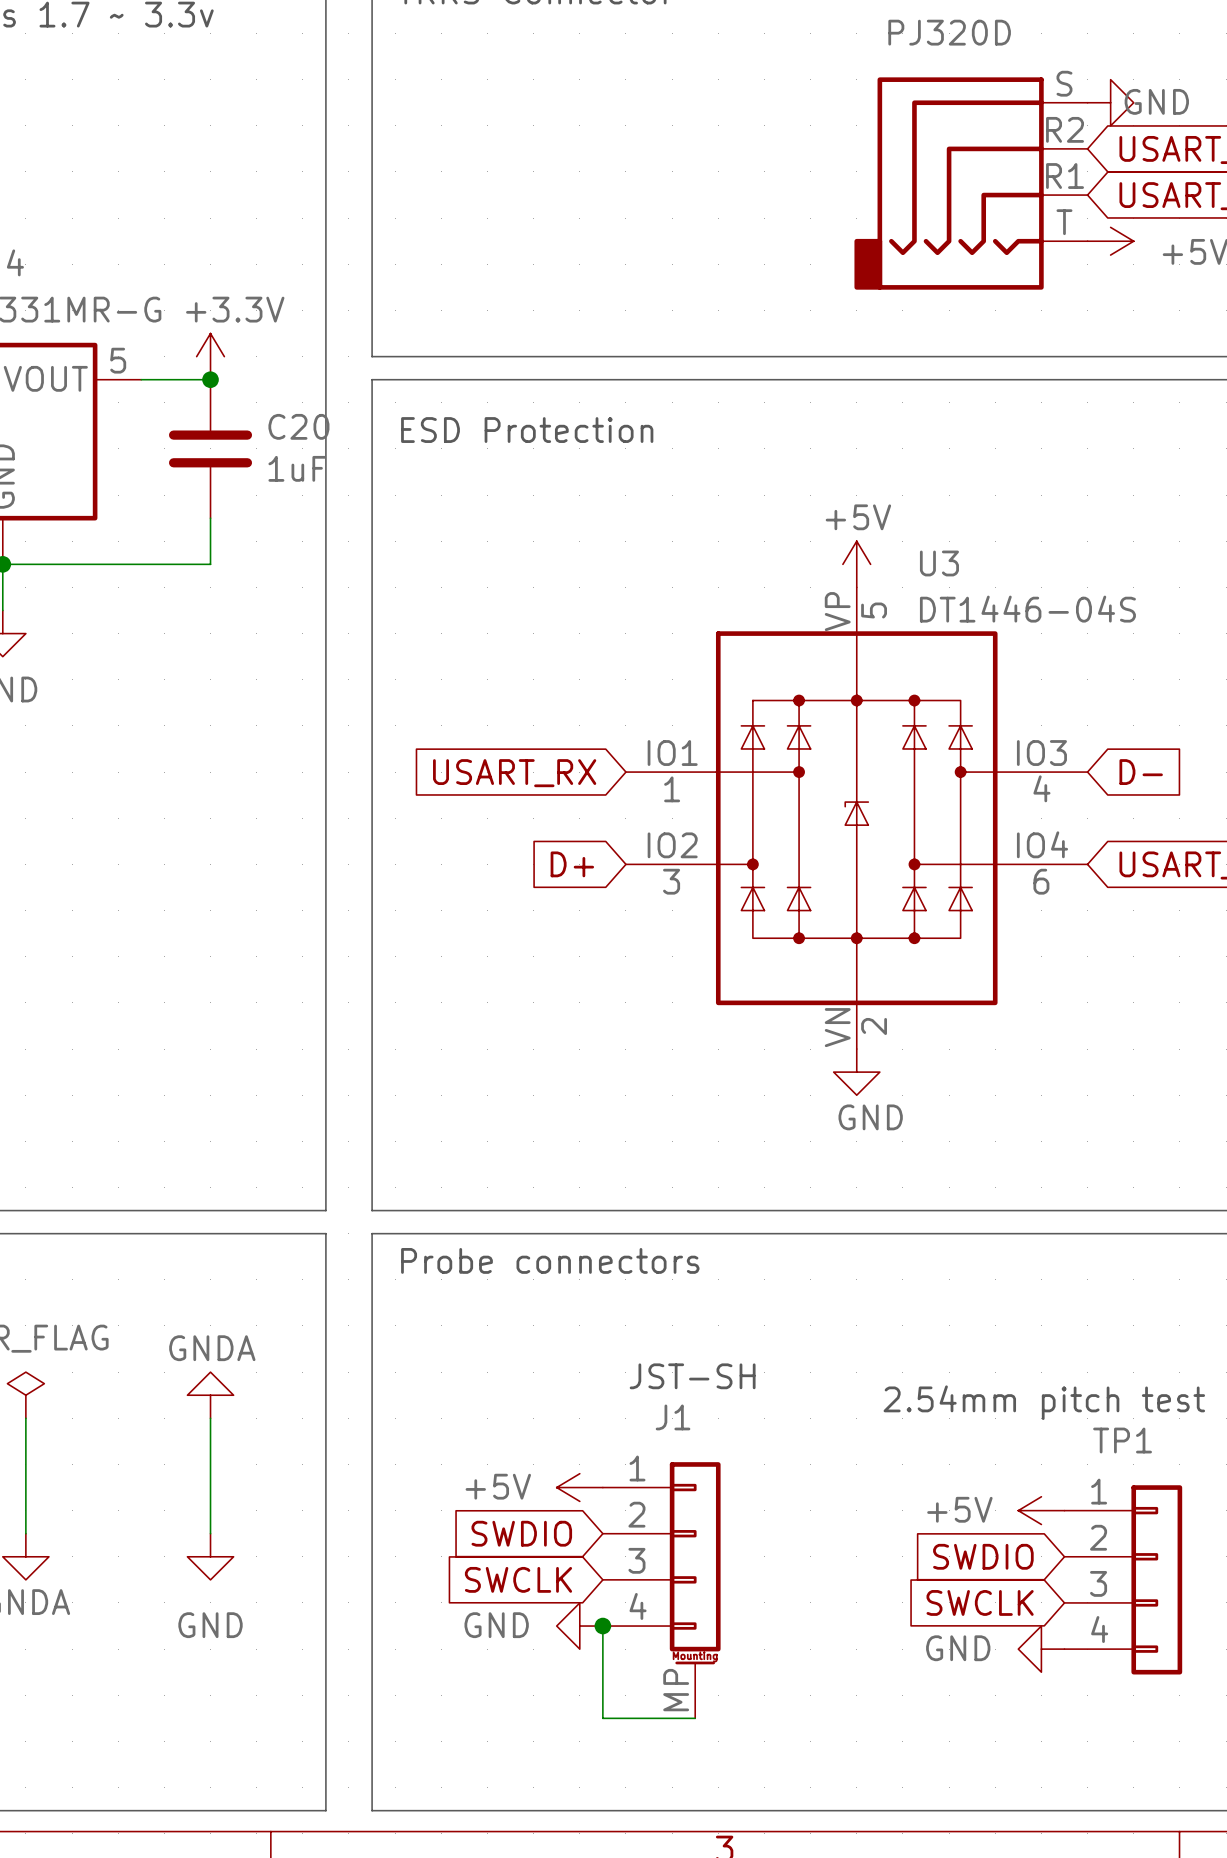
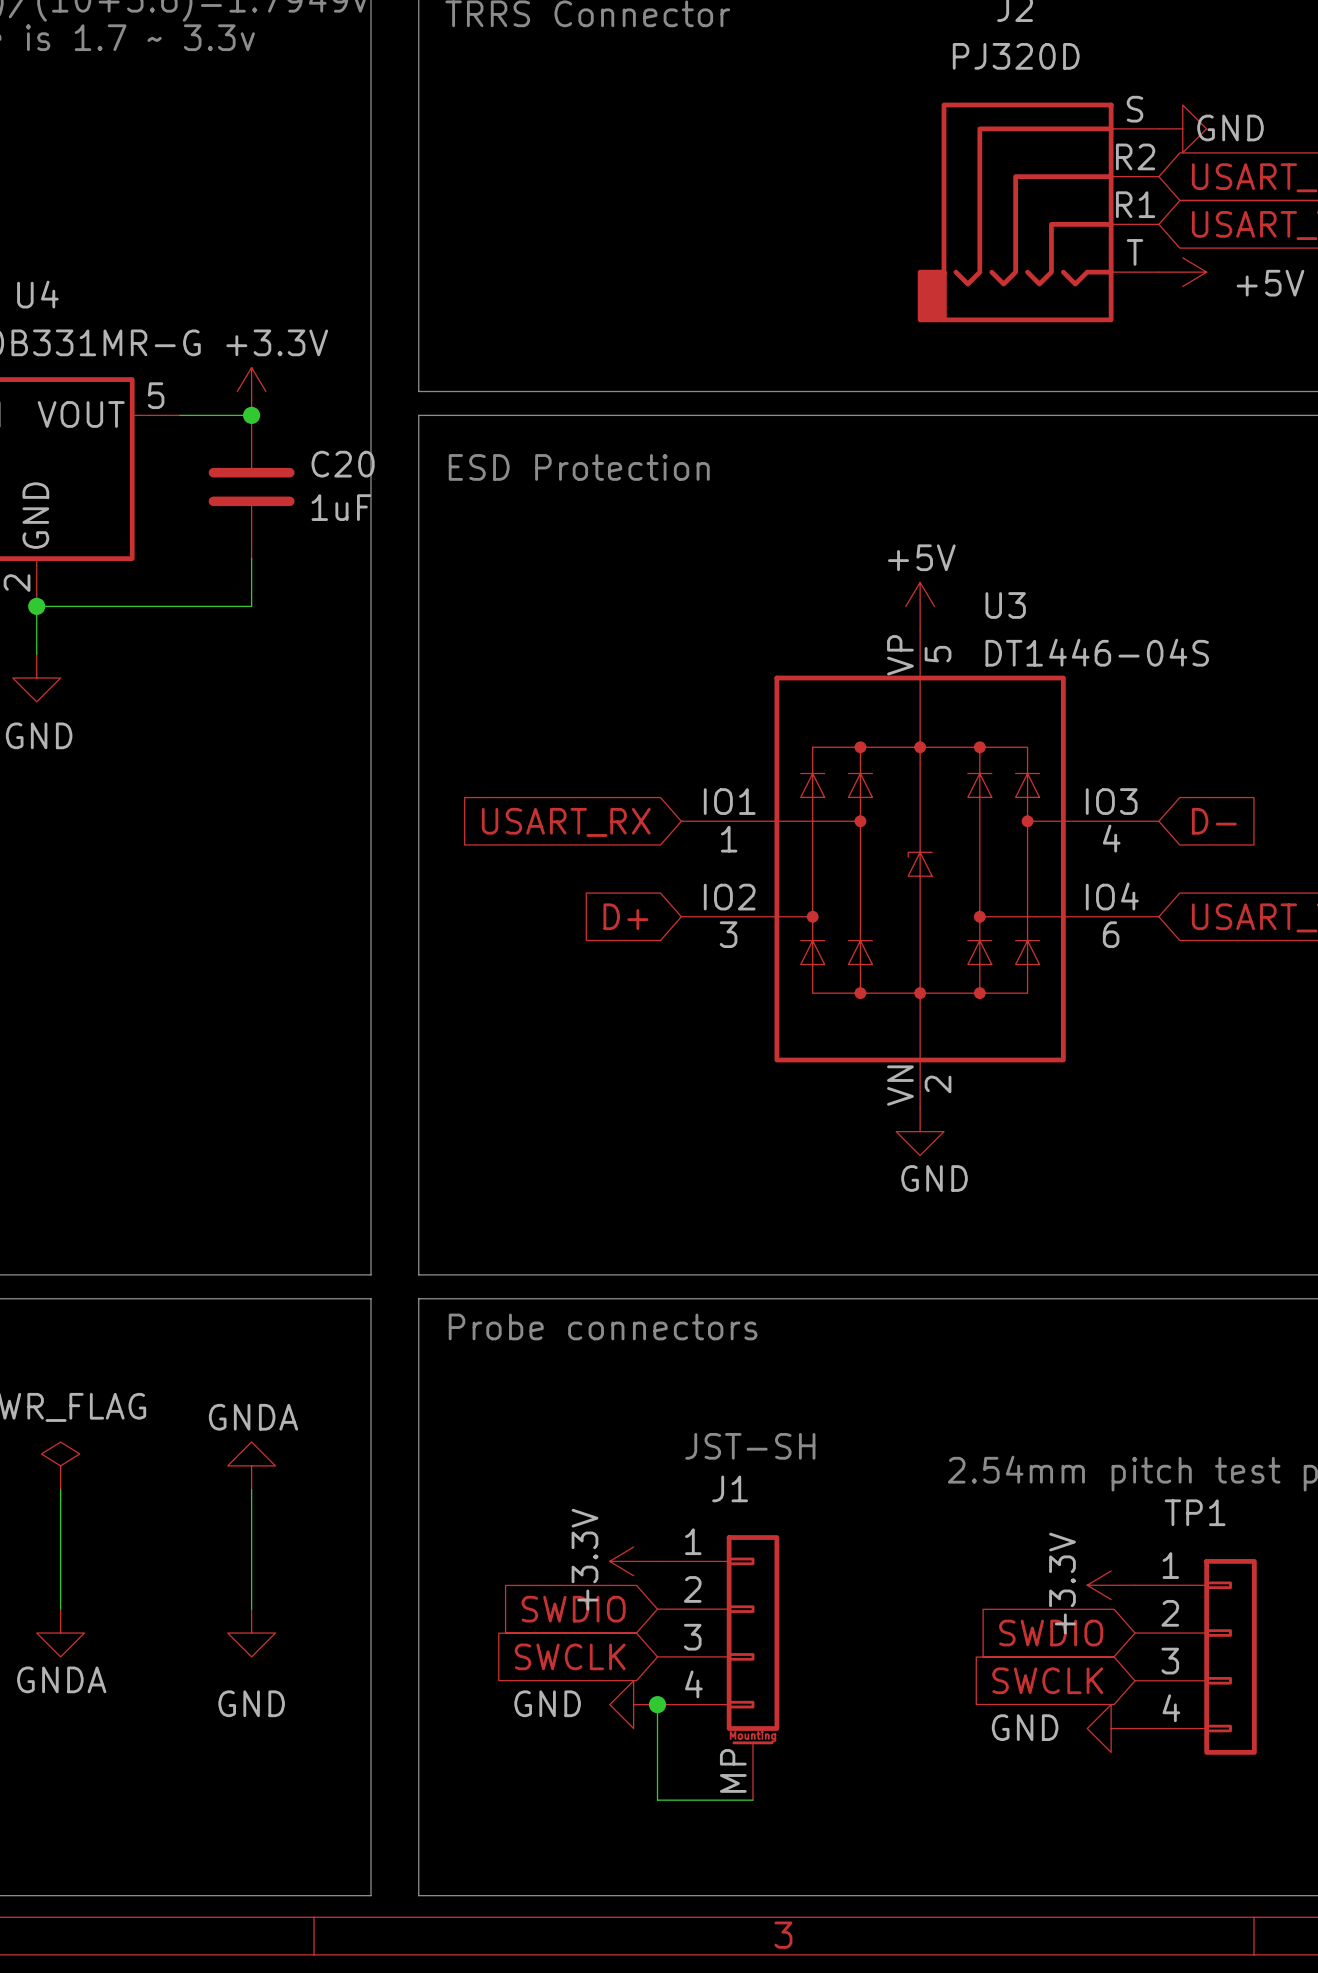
power symbol: +5V (579, 1487) -> +3.3V (633, 1561)
power symbol: +5V (1041, 1510) -> +3.3V (1111, 1585)

